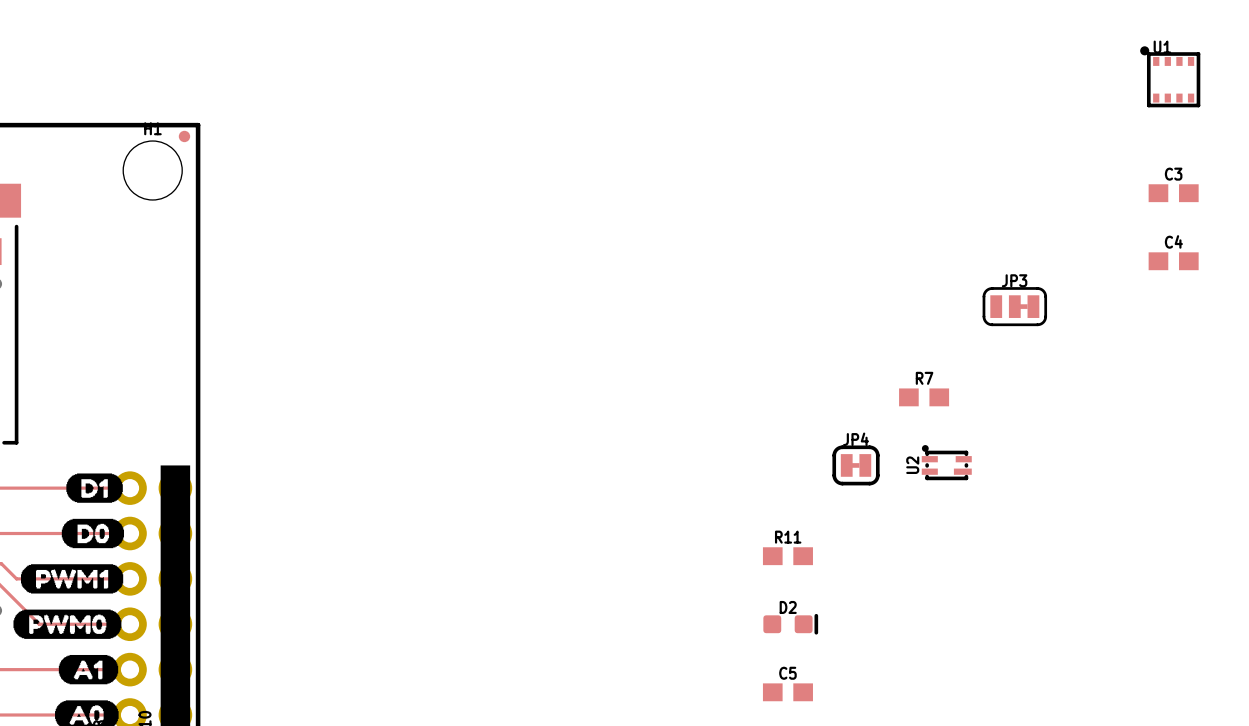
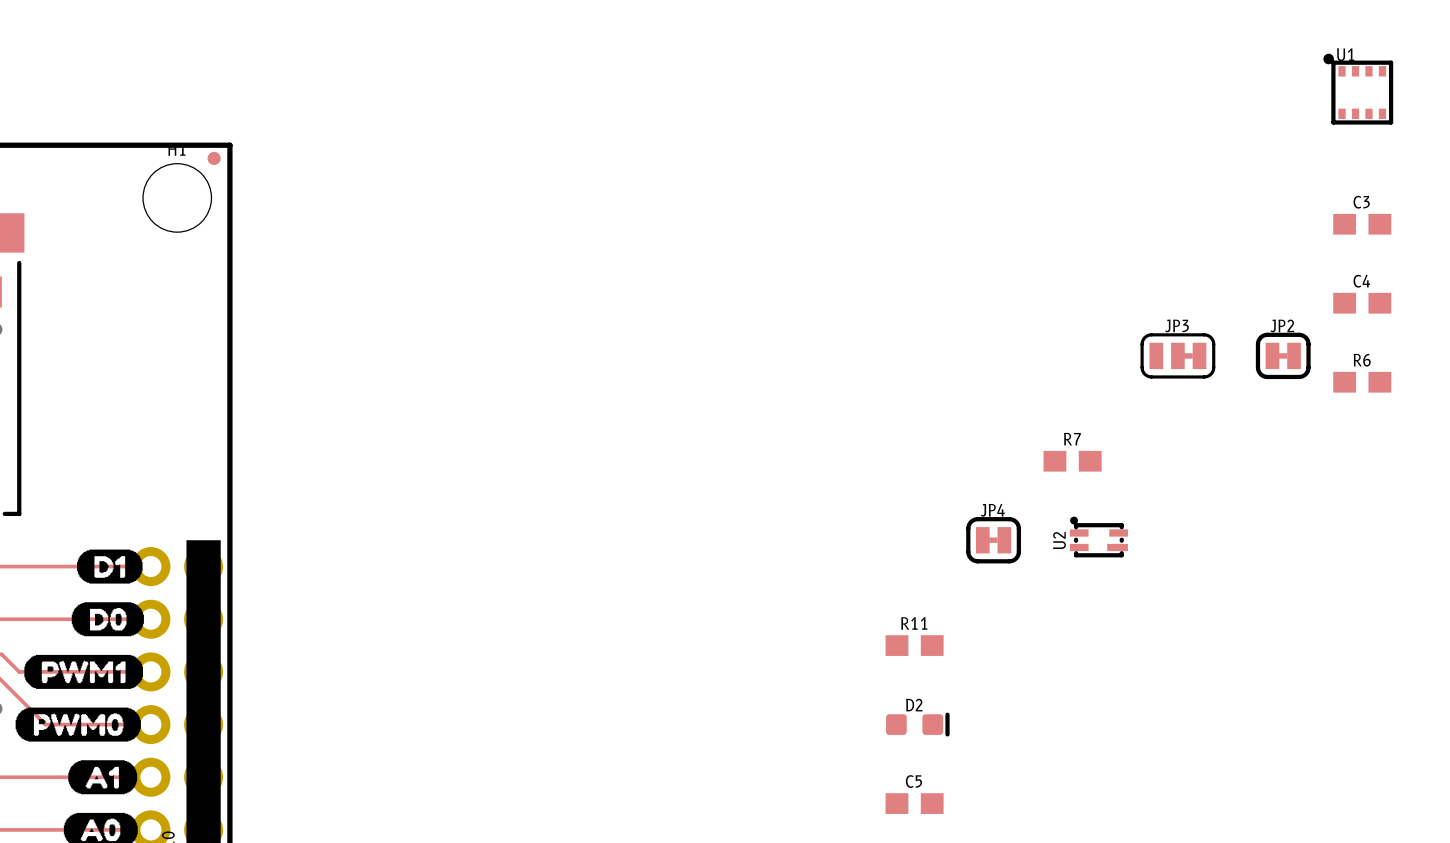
JP2: none -> (1283, 355)
R6: none -> (1362, 382)

